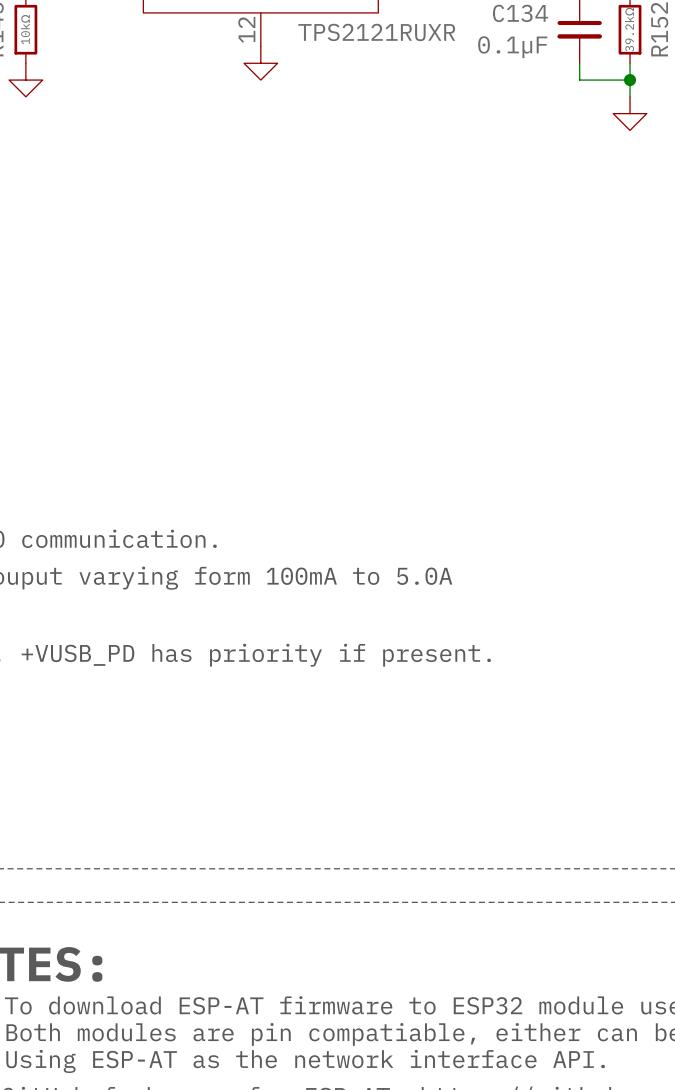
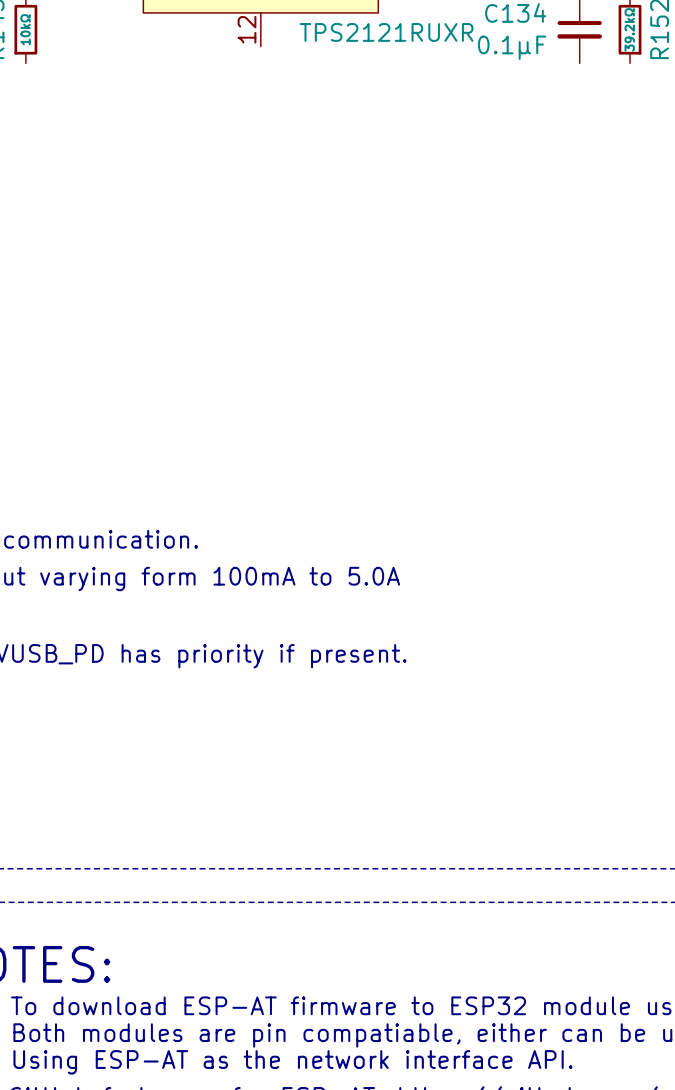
power symbol: (260, 63) -> none
wire: (579, 63) (579, 80) (630, 80) -> none
wire: (630, 63) (630, 96) -> none
power symbol: (25, 80) -> none
junction: (630, 80) -> none
power symbol: (630, 113) -> none

